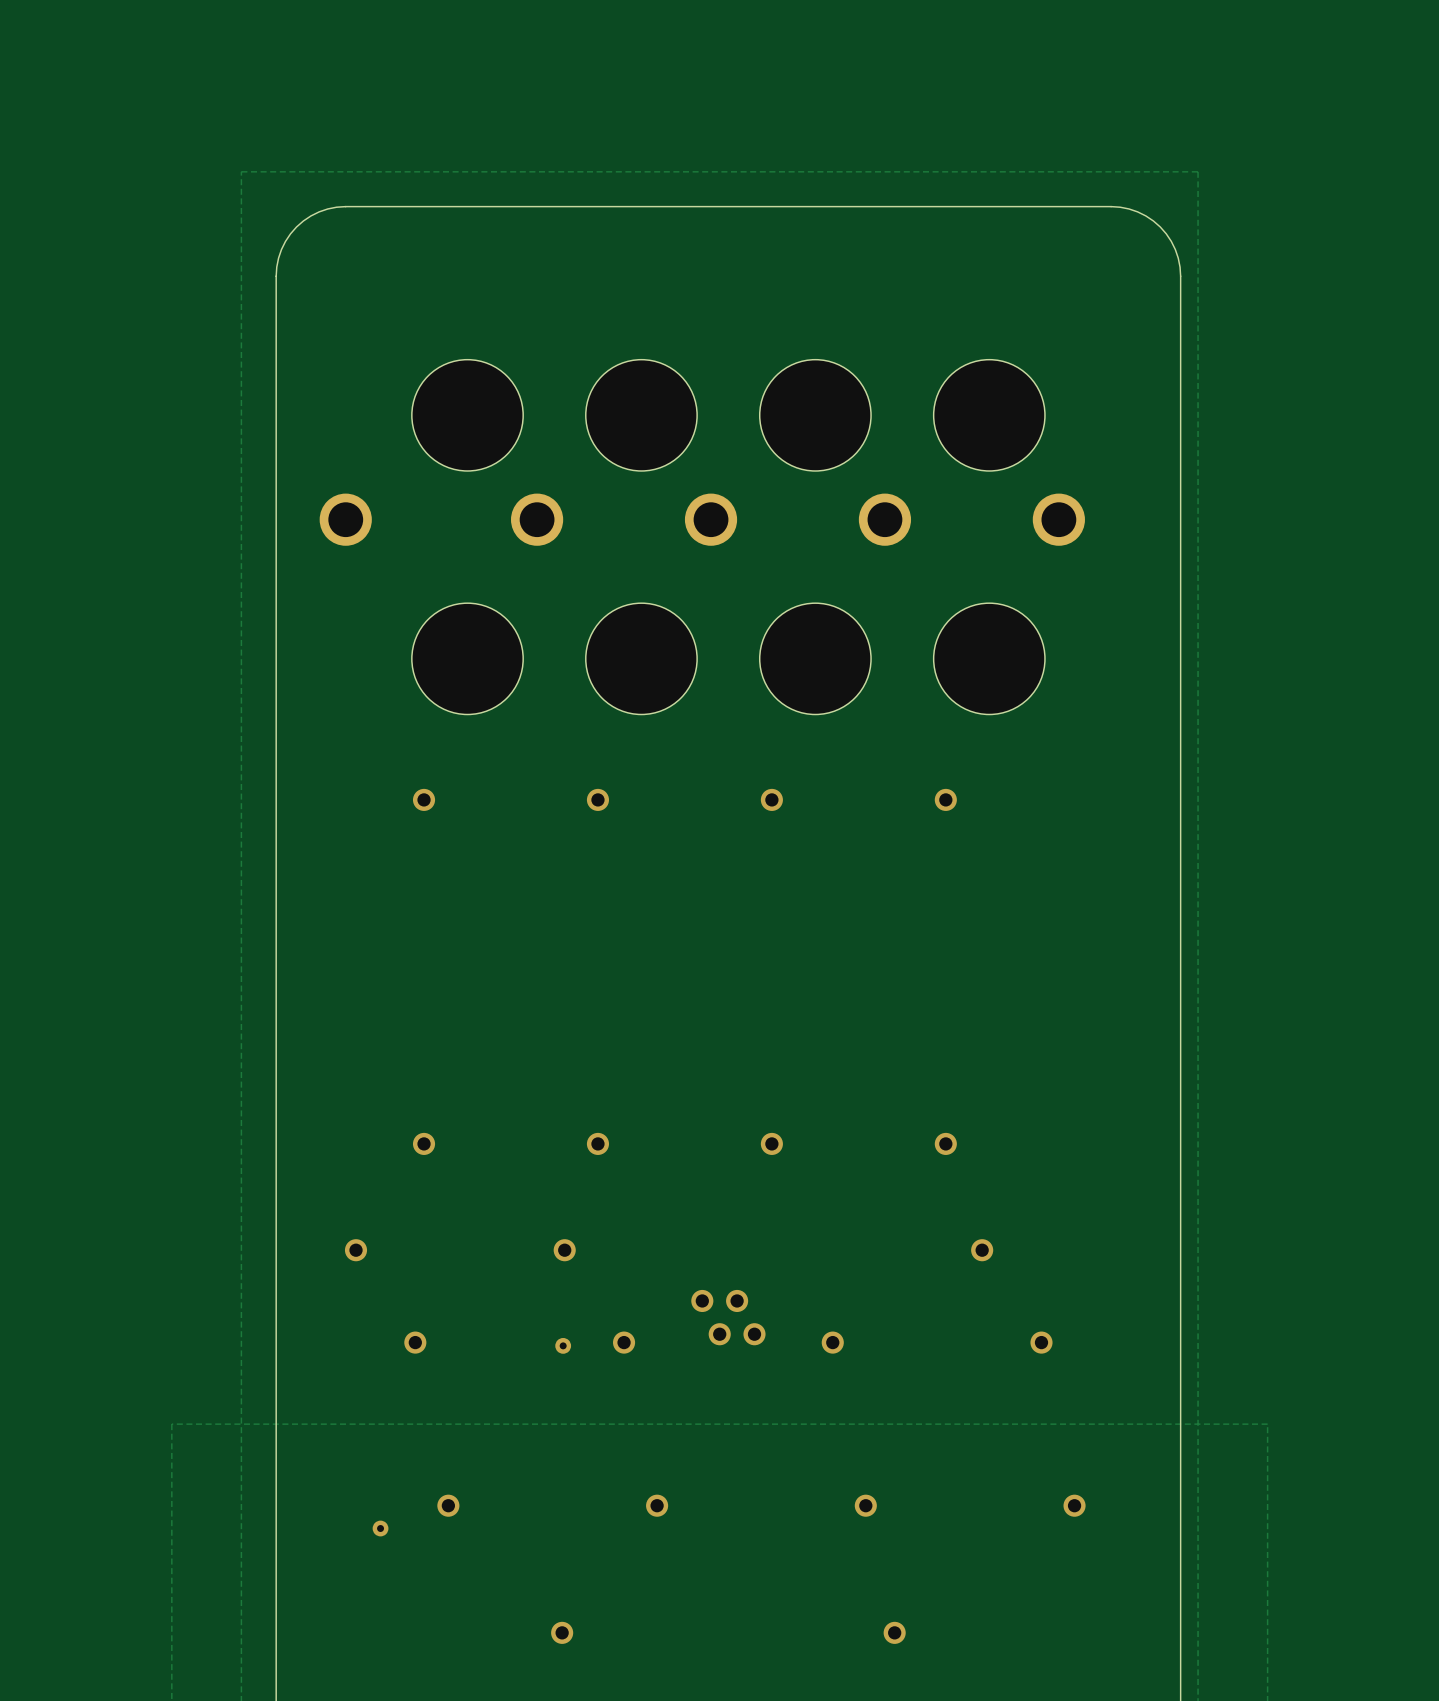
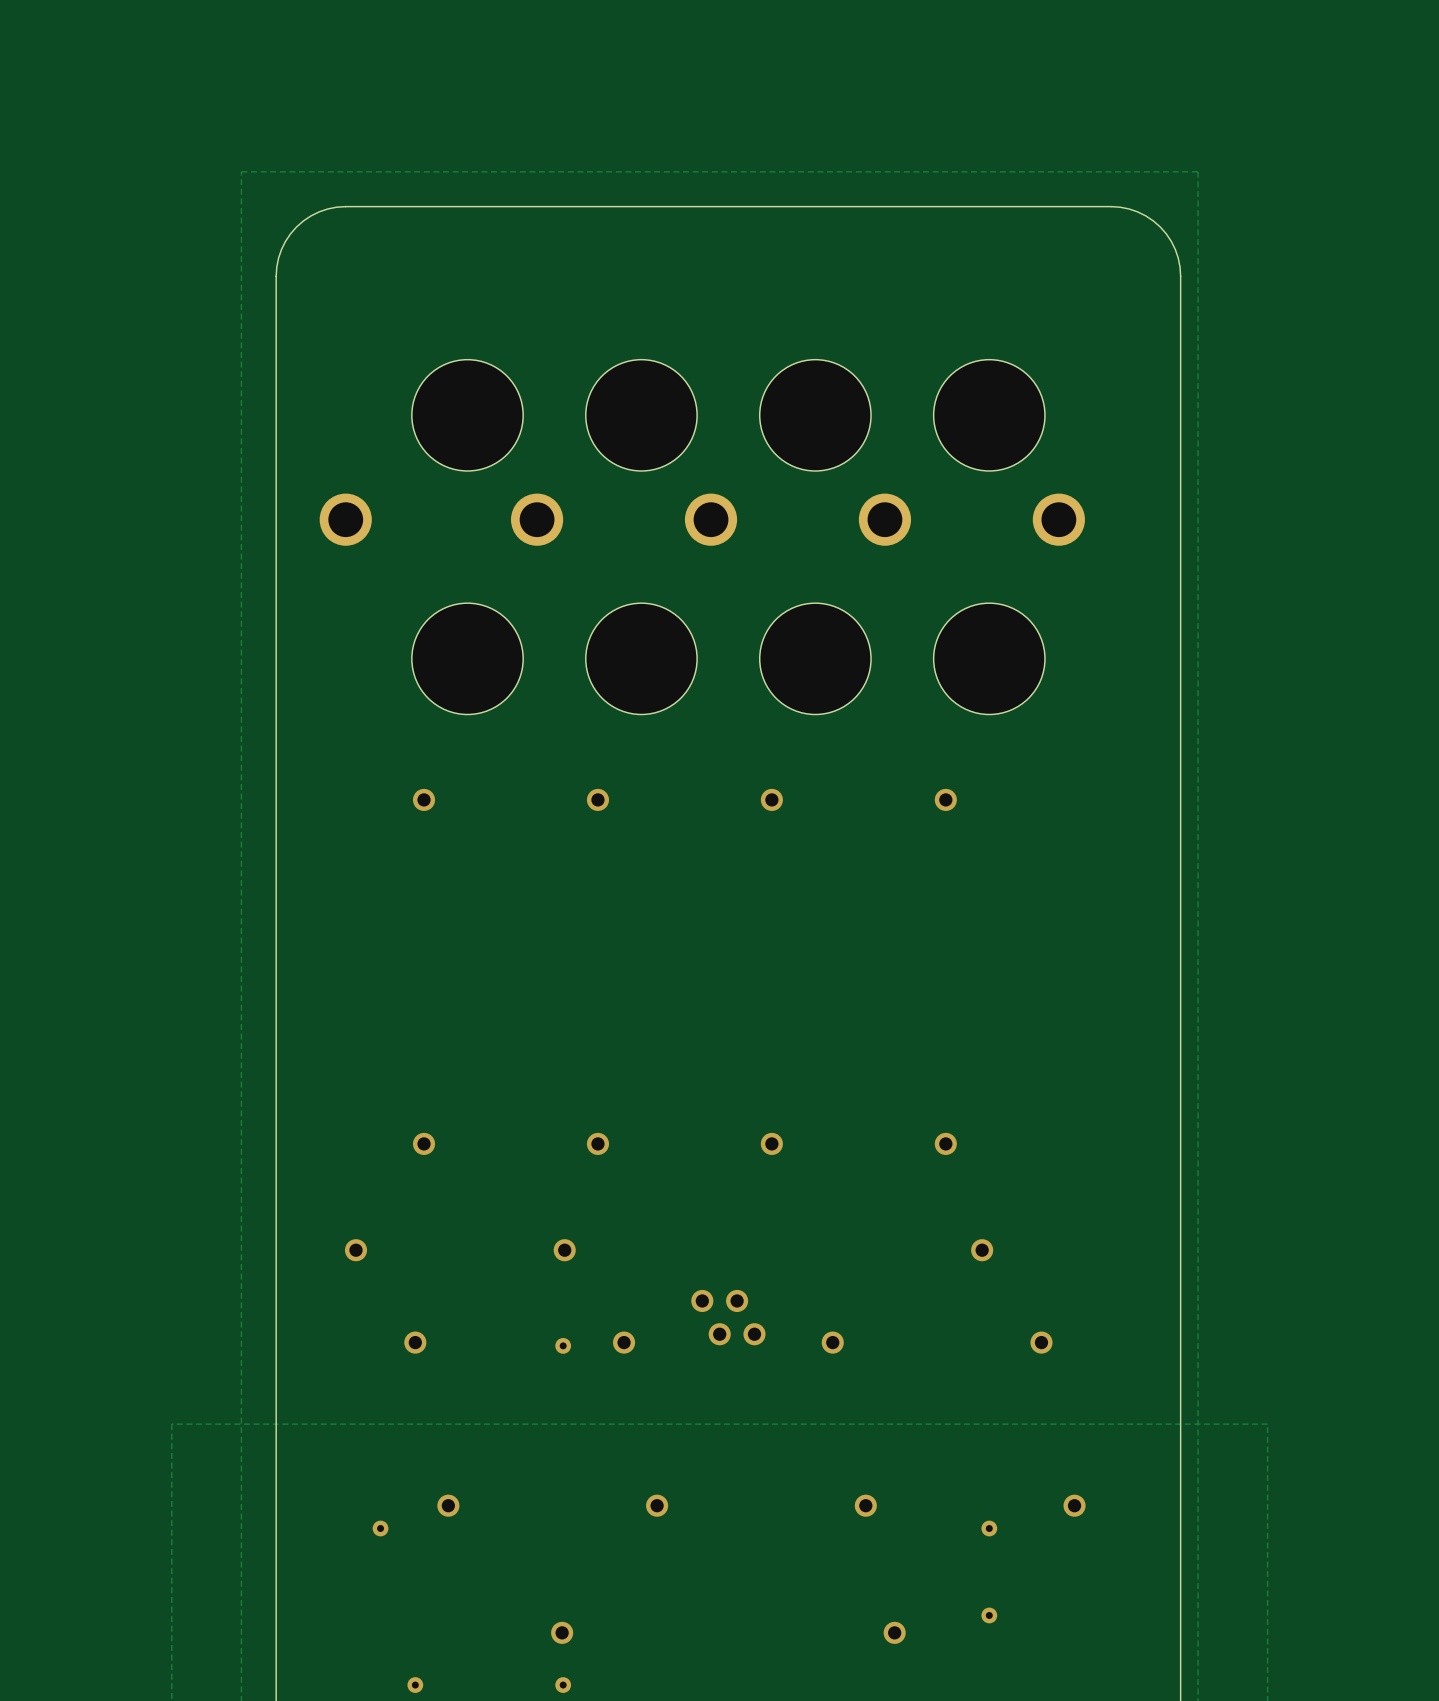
via: none -> (989, 1528)
via: none -> (989, 1615)
via: none -> (415, 1685)
via: none -> (563, 1685)

